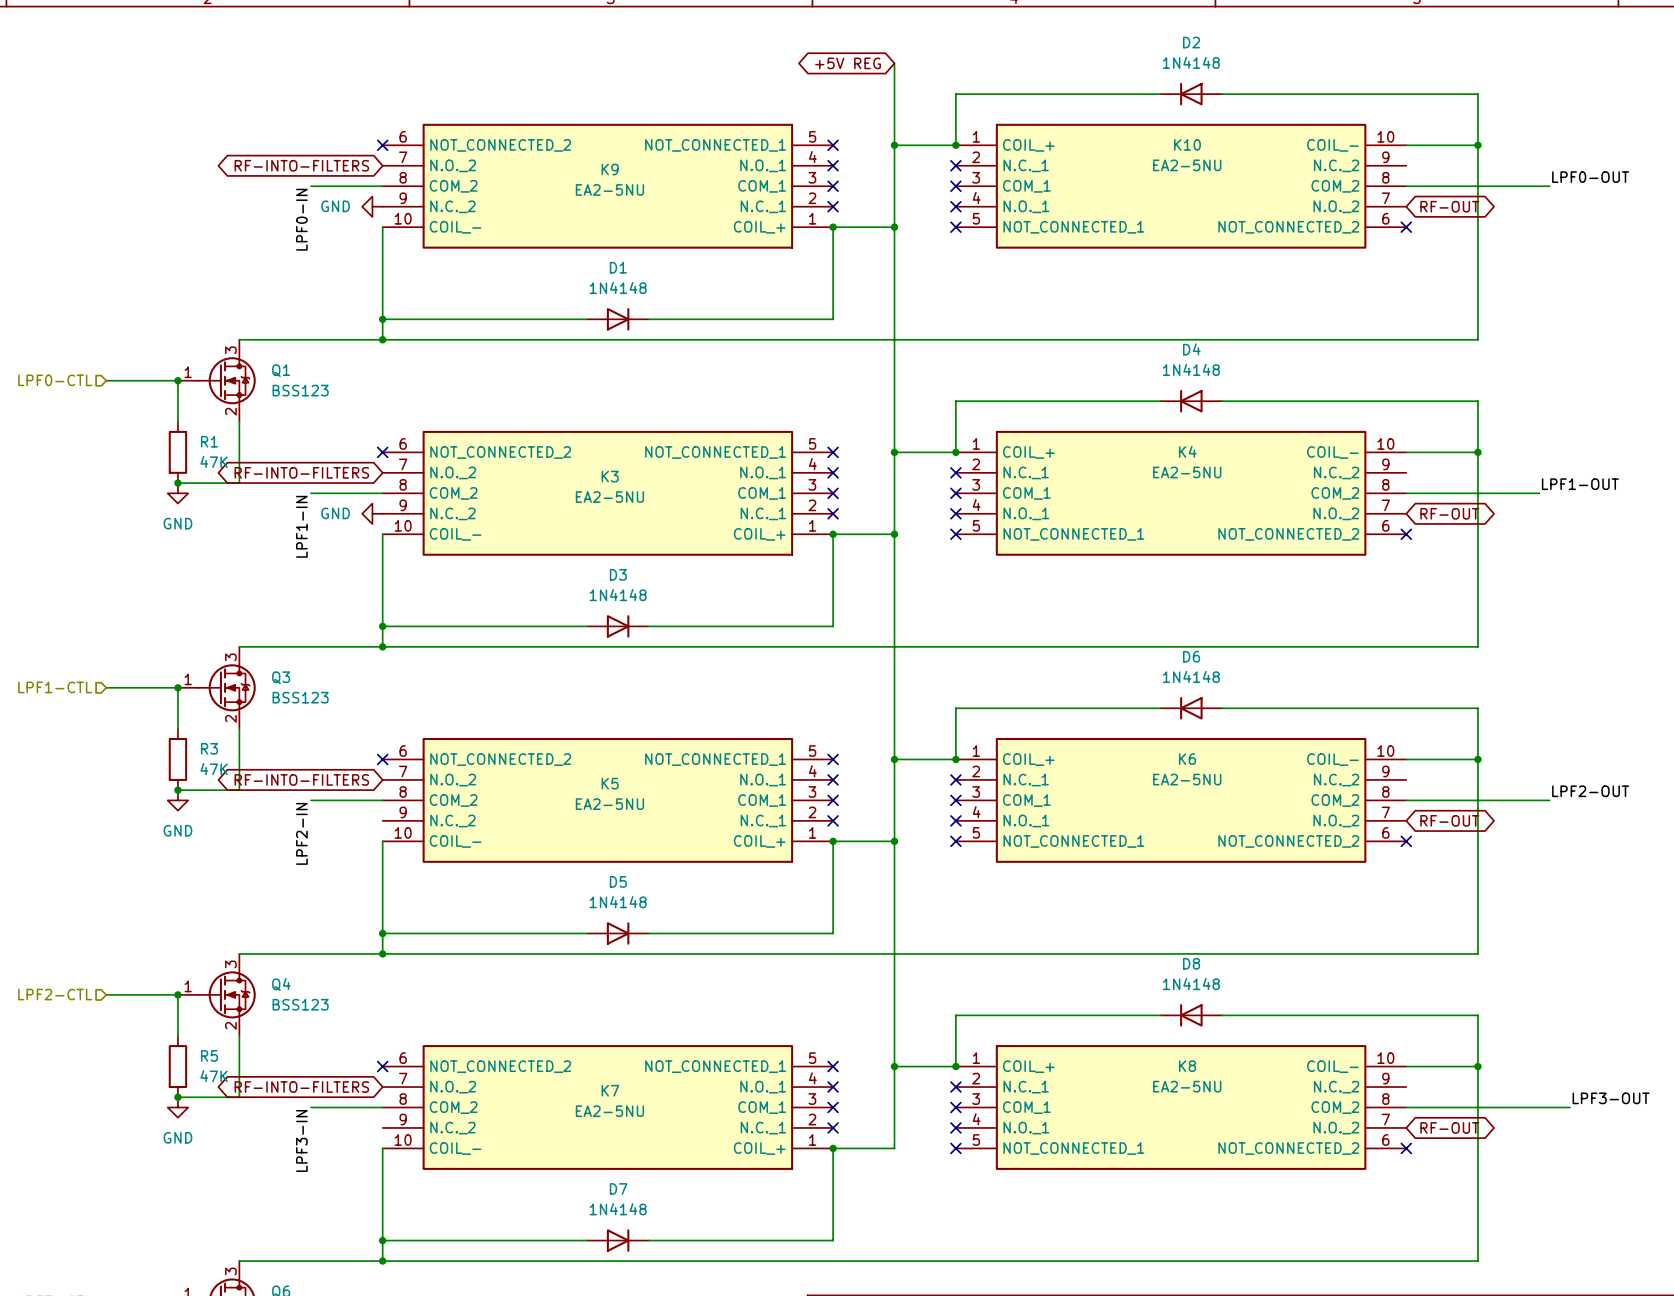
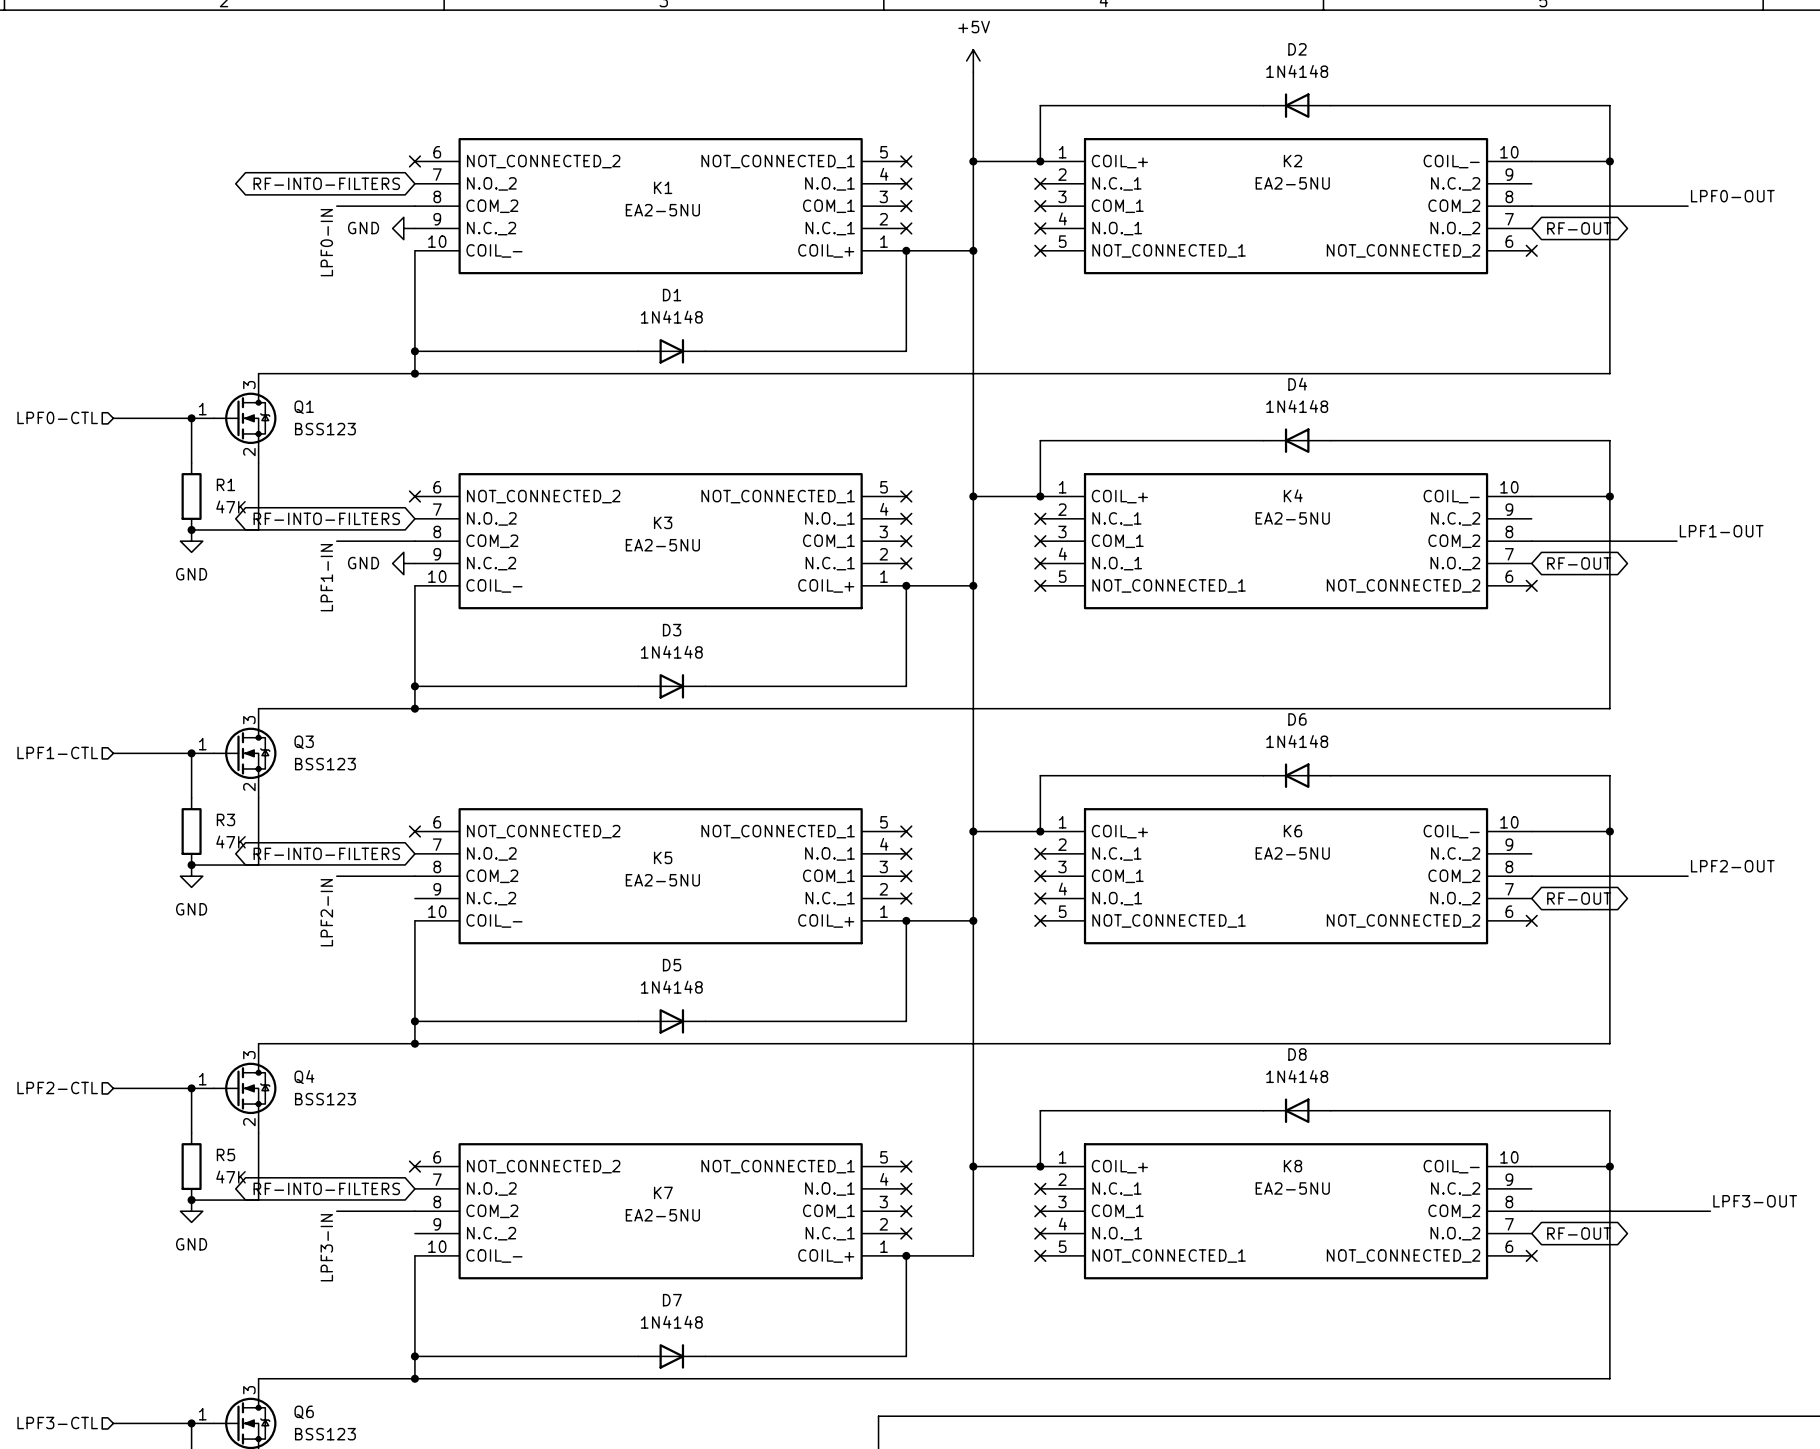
power symbol: none -> +5V (973, 60)
global label: +5V REG (848, 63) -> none
K10 name: K10 (1187, 144) -> K2 (1293, 161)
K9 name: K9 (610, 169) -> K1 (663, 187)

